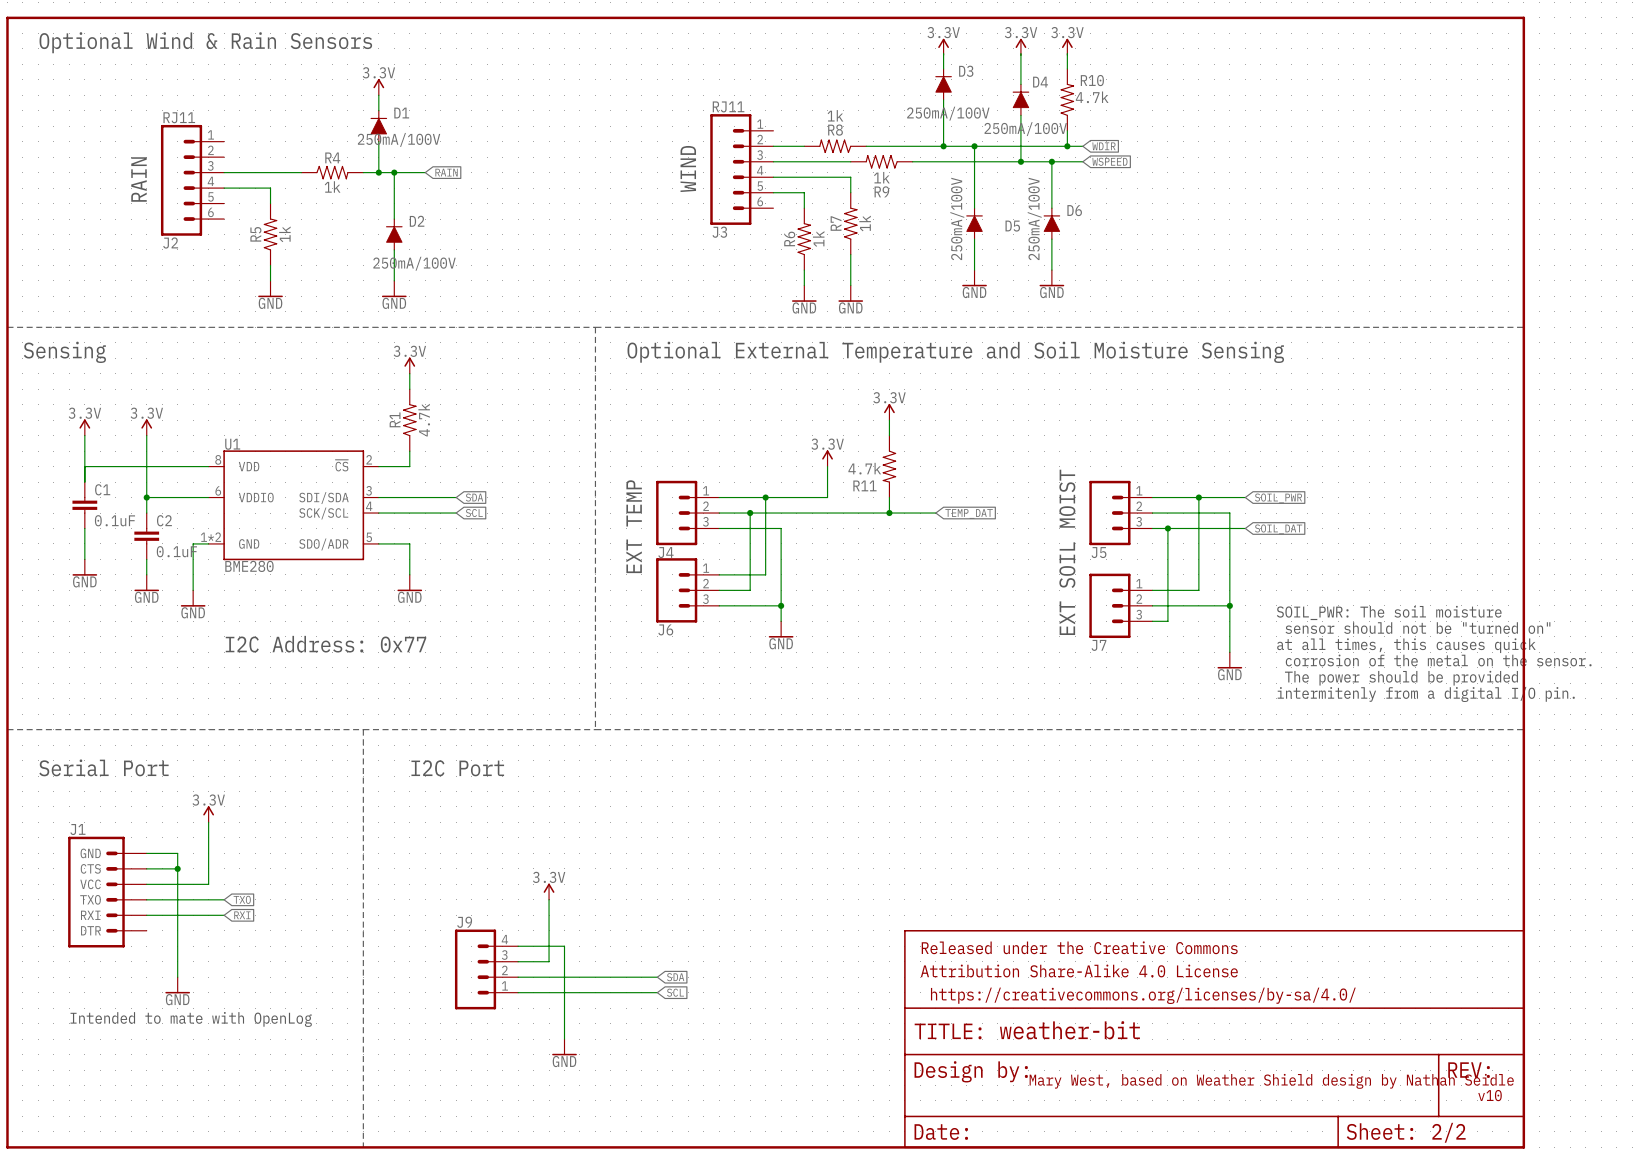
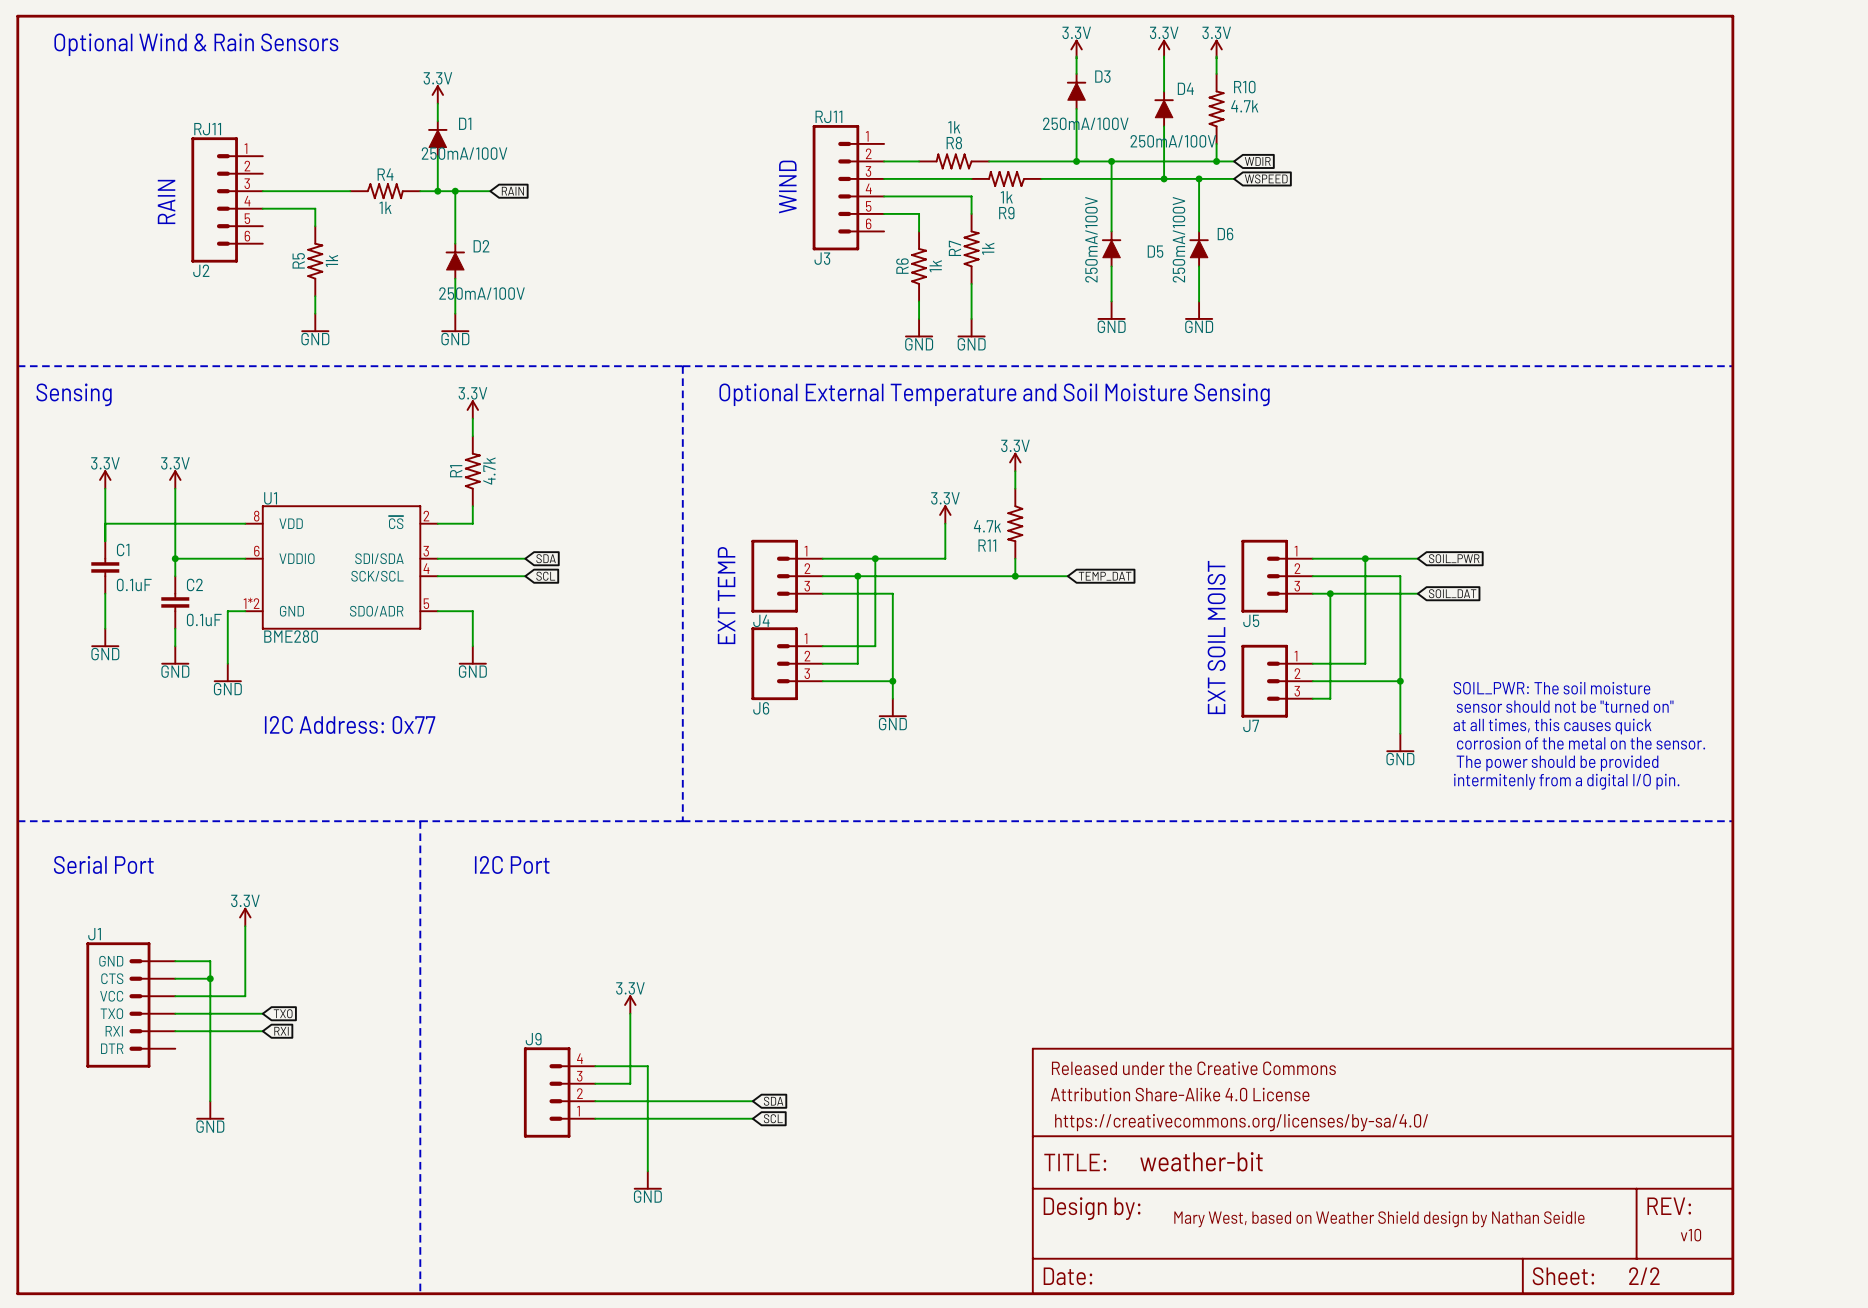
text: Intended to mate with OpenLog (191, 1019) -> none

